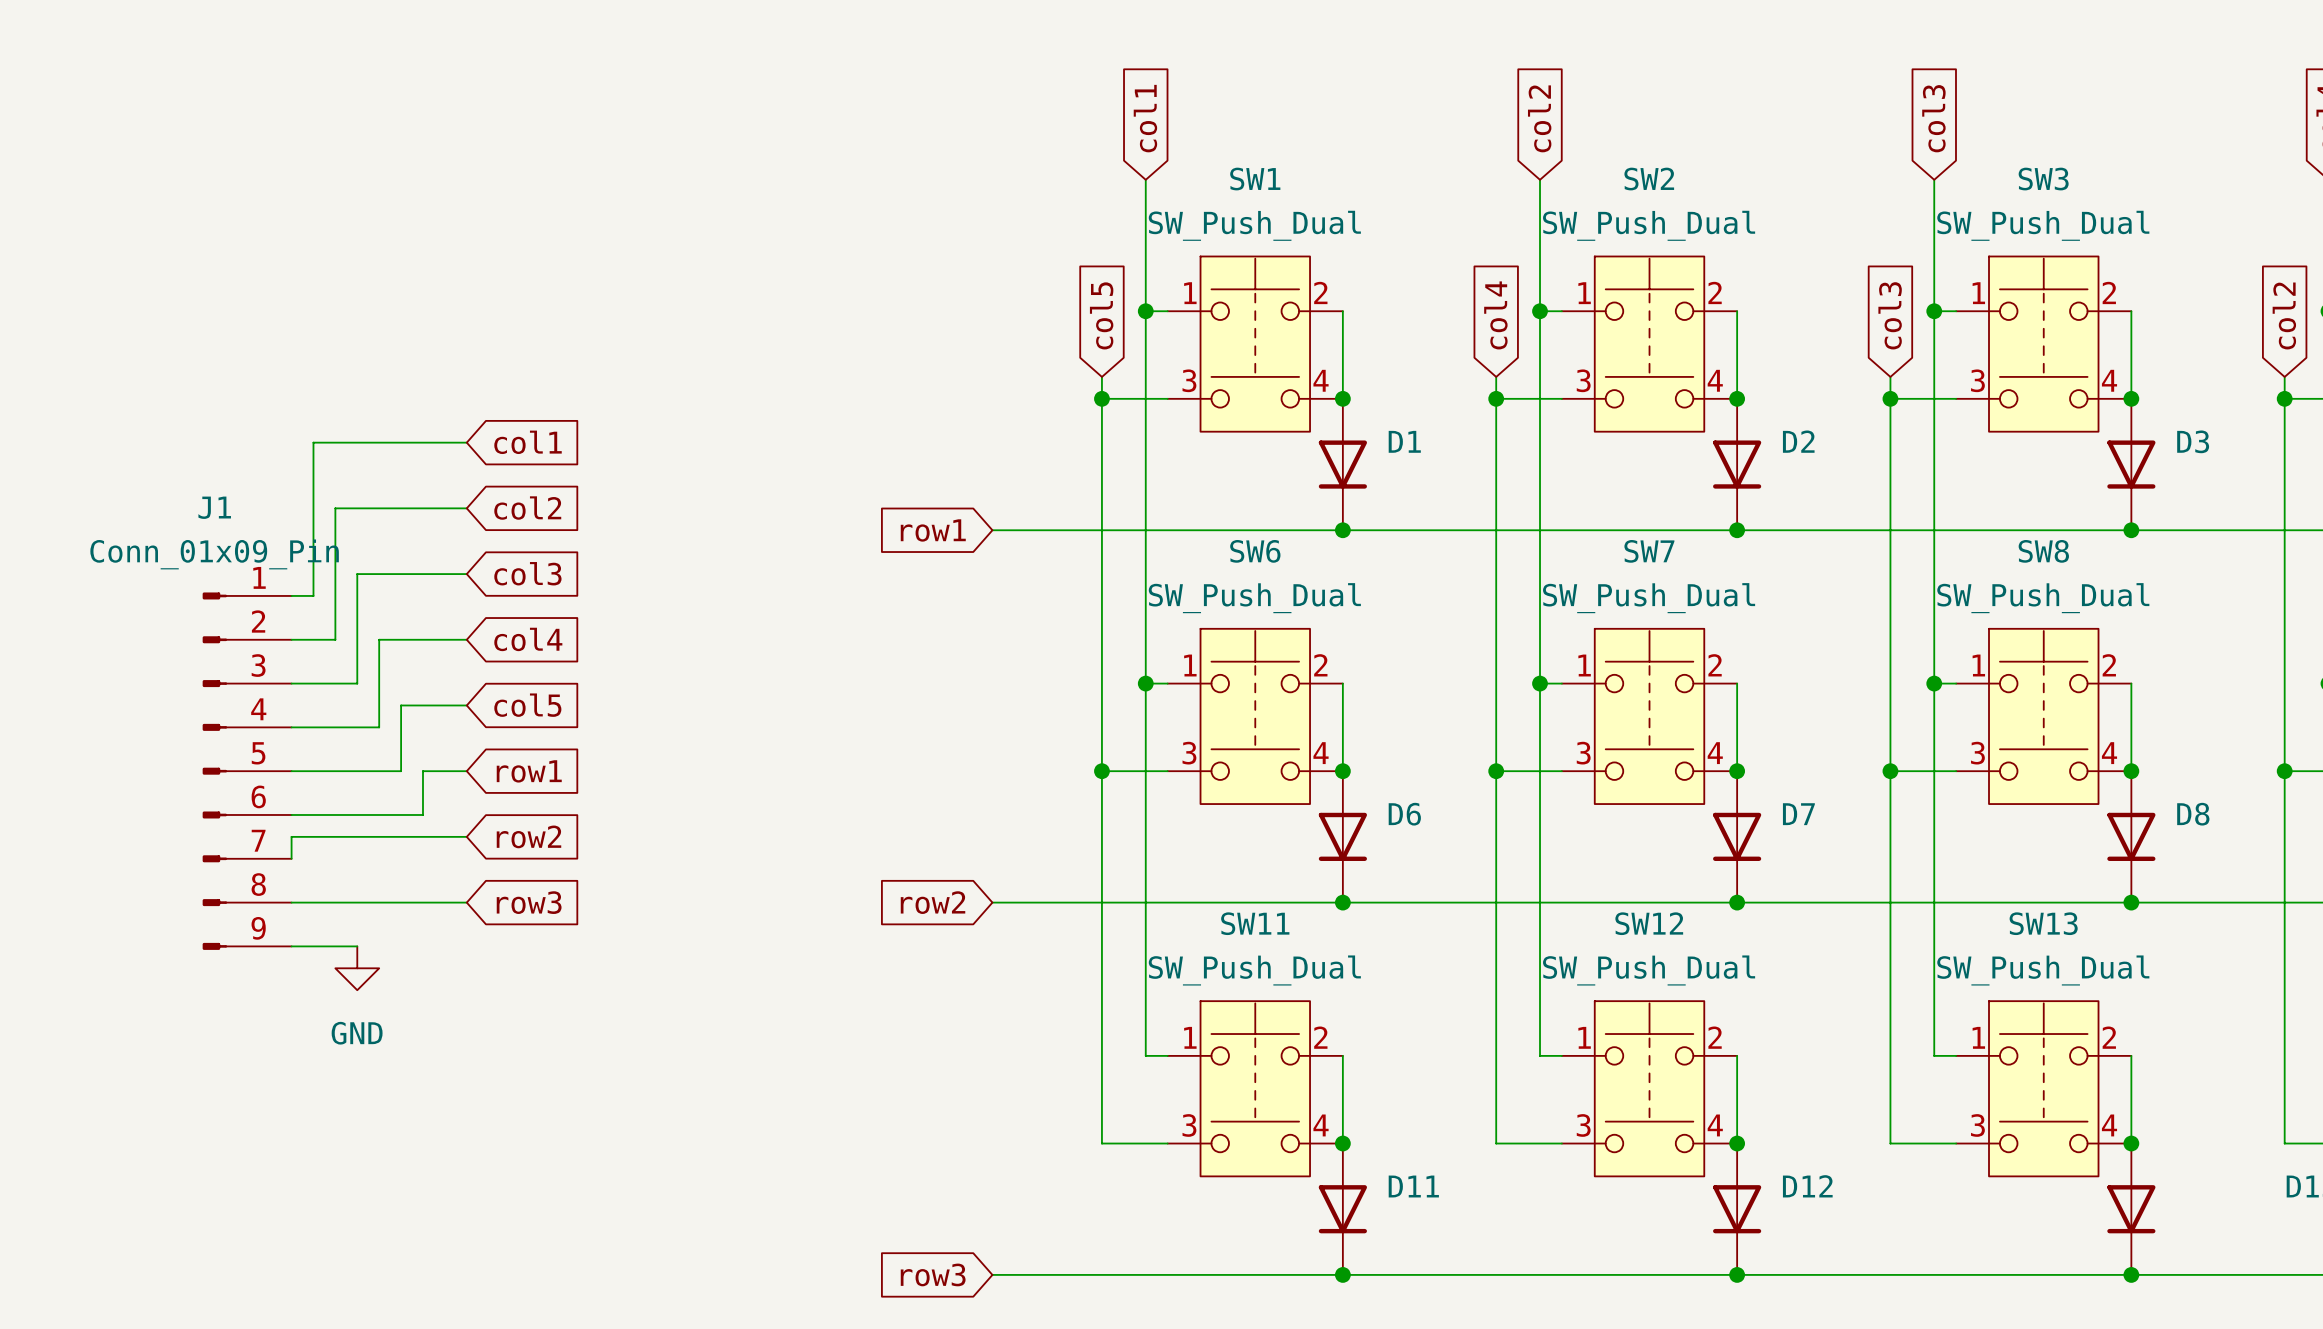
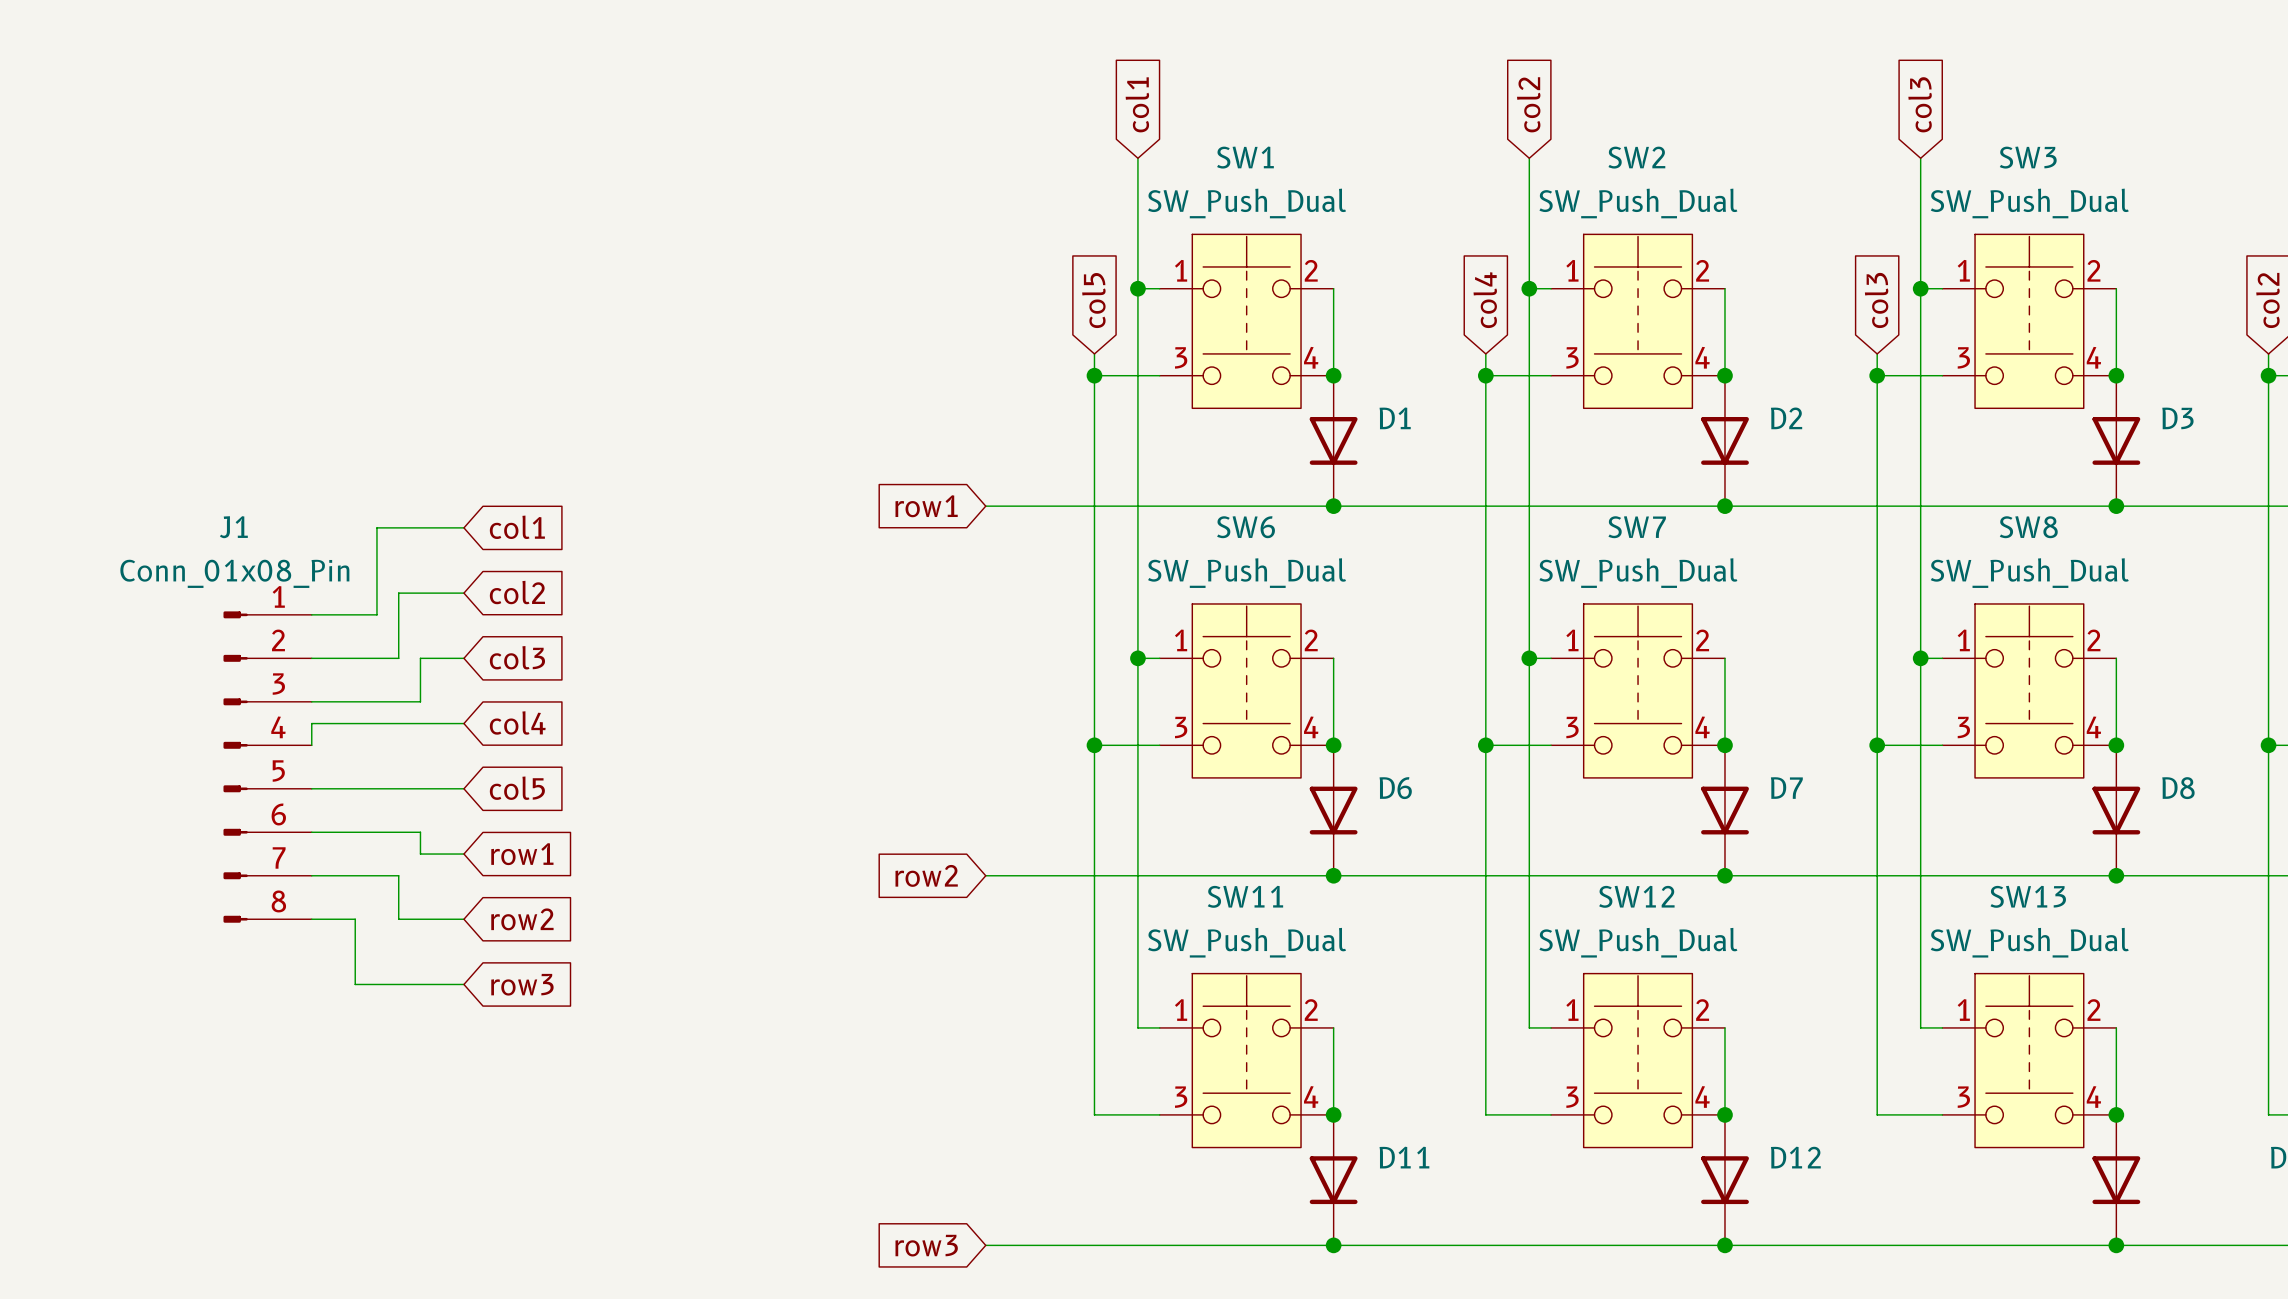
wire: (466, 442) (313, 442) (313, 595) (291, 595) -> none
global label position: col1 (528, 442) -> col1 (517, 527)
wire: (466, 508) (335, 508) (335, 639) -> (463, 527) (376, 527) (376, 614) (333, 614)
global label position: col2 (527, 508) -> col2 (517, 592)
J1 value: Conn_01x09_Pin (214, 554) -> Conn_01x08_Pin (234, 573)
global label position: col3 (527, 573) -> col3 (517, 657)
wire: (466, 574) (357, 574) (357, 683) -> (463, 593) (398, 593) (398, 658) (355, 658)
J1 symbol: [202, 592, 292, 950] -> [223, 611, 312, 923]
wire: (466, 639) (379, 639) (379, 727) -> (463, 658) (420, 658) (420, 701) (376, 701)
global label position: col4 (528, 639) -> col4 (517, 722)
wire: (466, 705) (401, 705) (401, 771) (291, 771) -> none
global label position: col5 (527, 705) -> col5 (517, 788)
wire: none -> (463, 723) (311, 723) (311, 745)
wire: (466, 771) (422, 771) (422, 814) -> (463, 788) (420, 788)
global label position: row1 (529, 771) -> row1 (522, 854)
wire: (466, 836) (291, 836) (291, 858) -> none
global label position: row2 (528, 836) -> row2 (522, 919)
wire: none -> (311, 832) (420, 832) (420, 854) (463, 854)
wire: (401, 902) (466, 902) -> (398, 875) (398, 919) (463, 919)
global label position: row3 (529, 902) -> row3 (522, 984)
wire: none -> (355, 919) (355, 984) (463, 984)
power symbol: GND (357, 968) -> none

